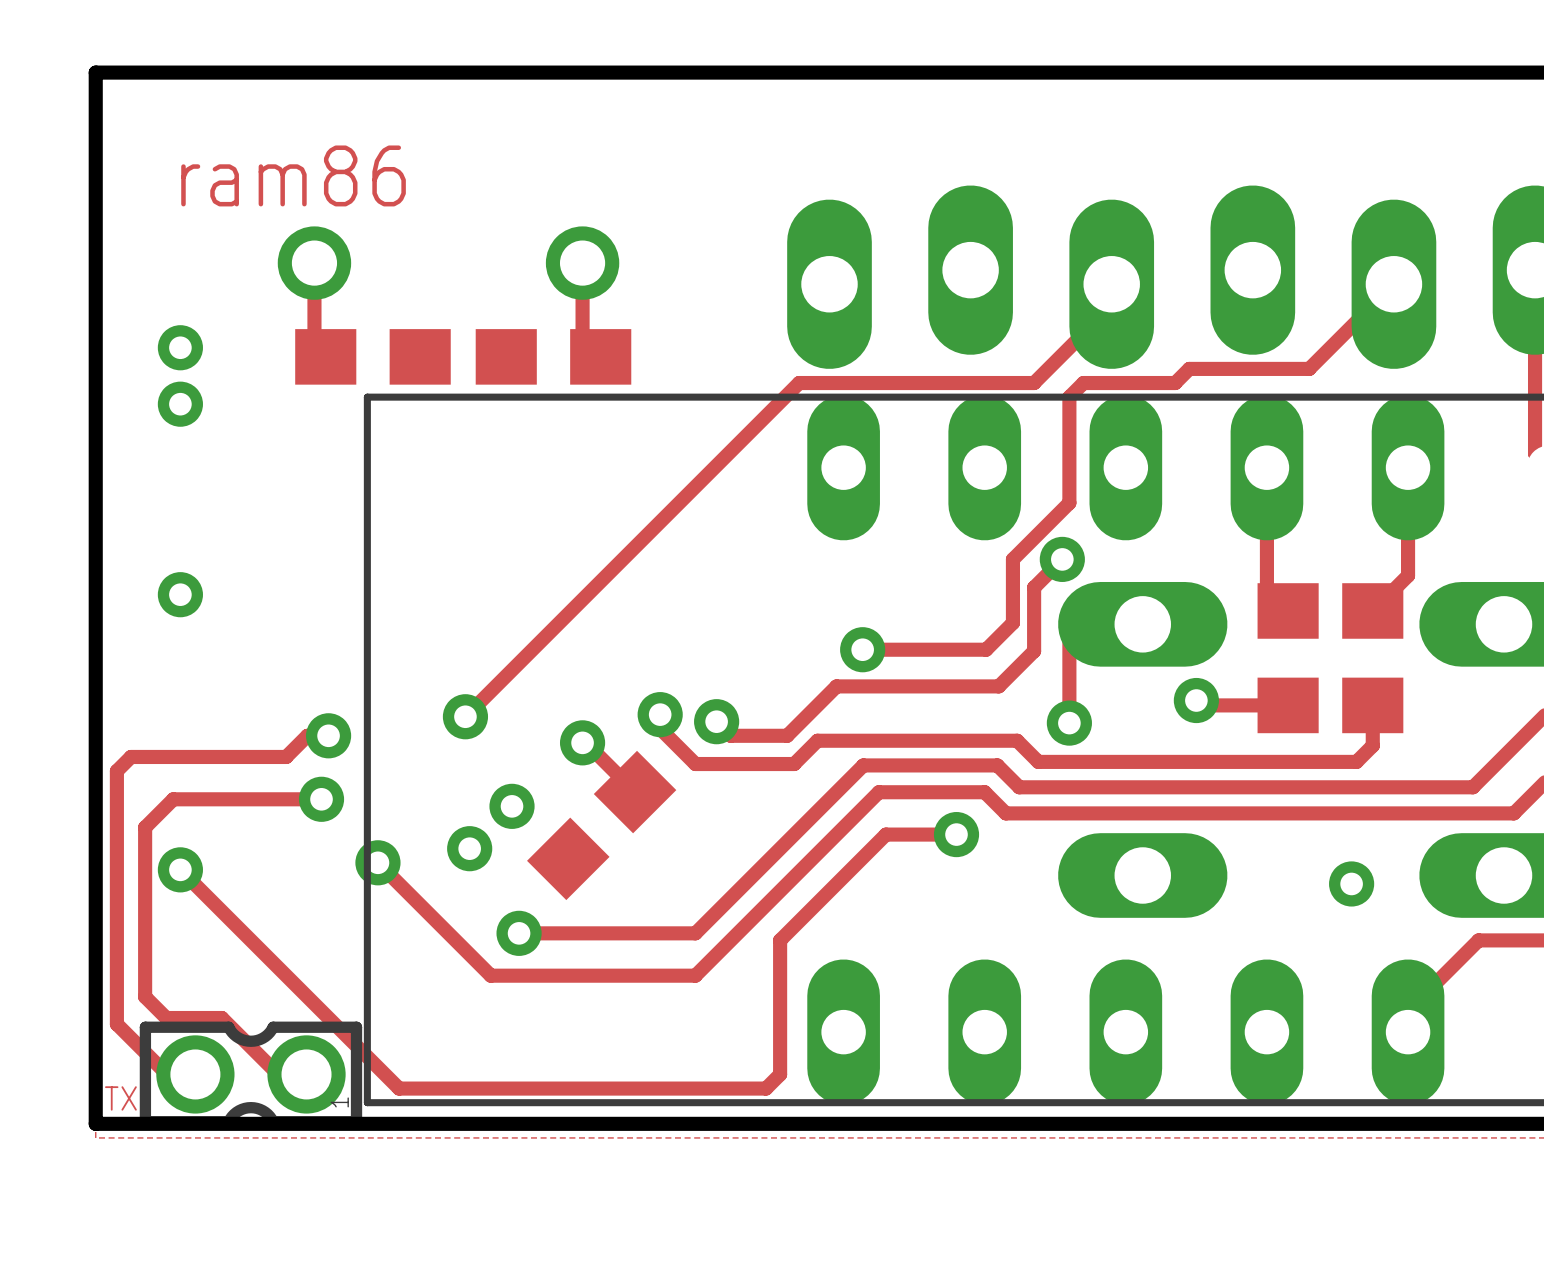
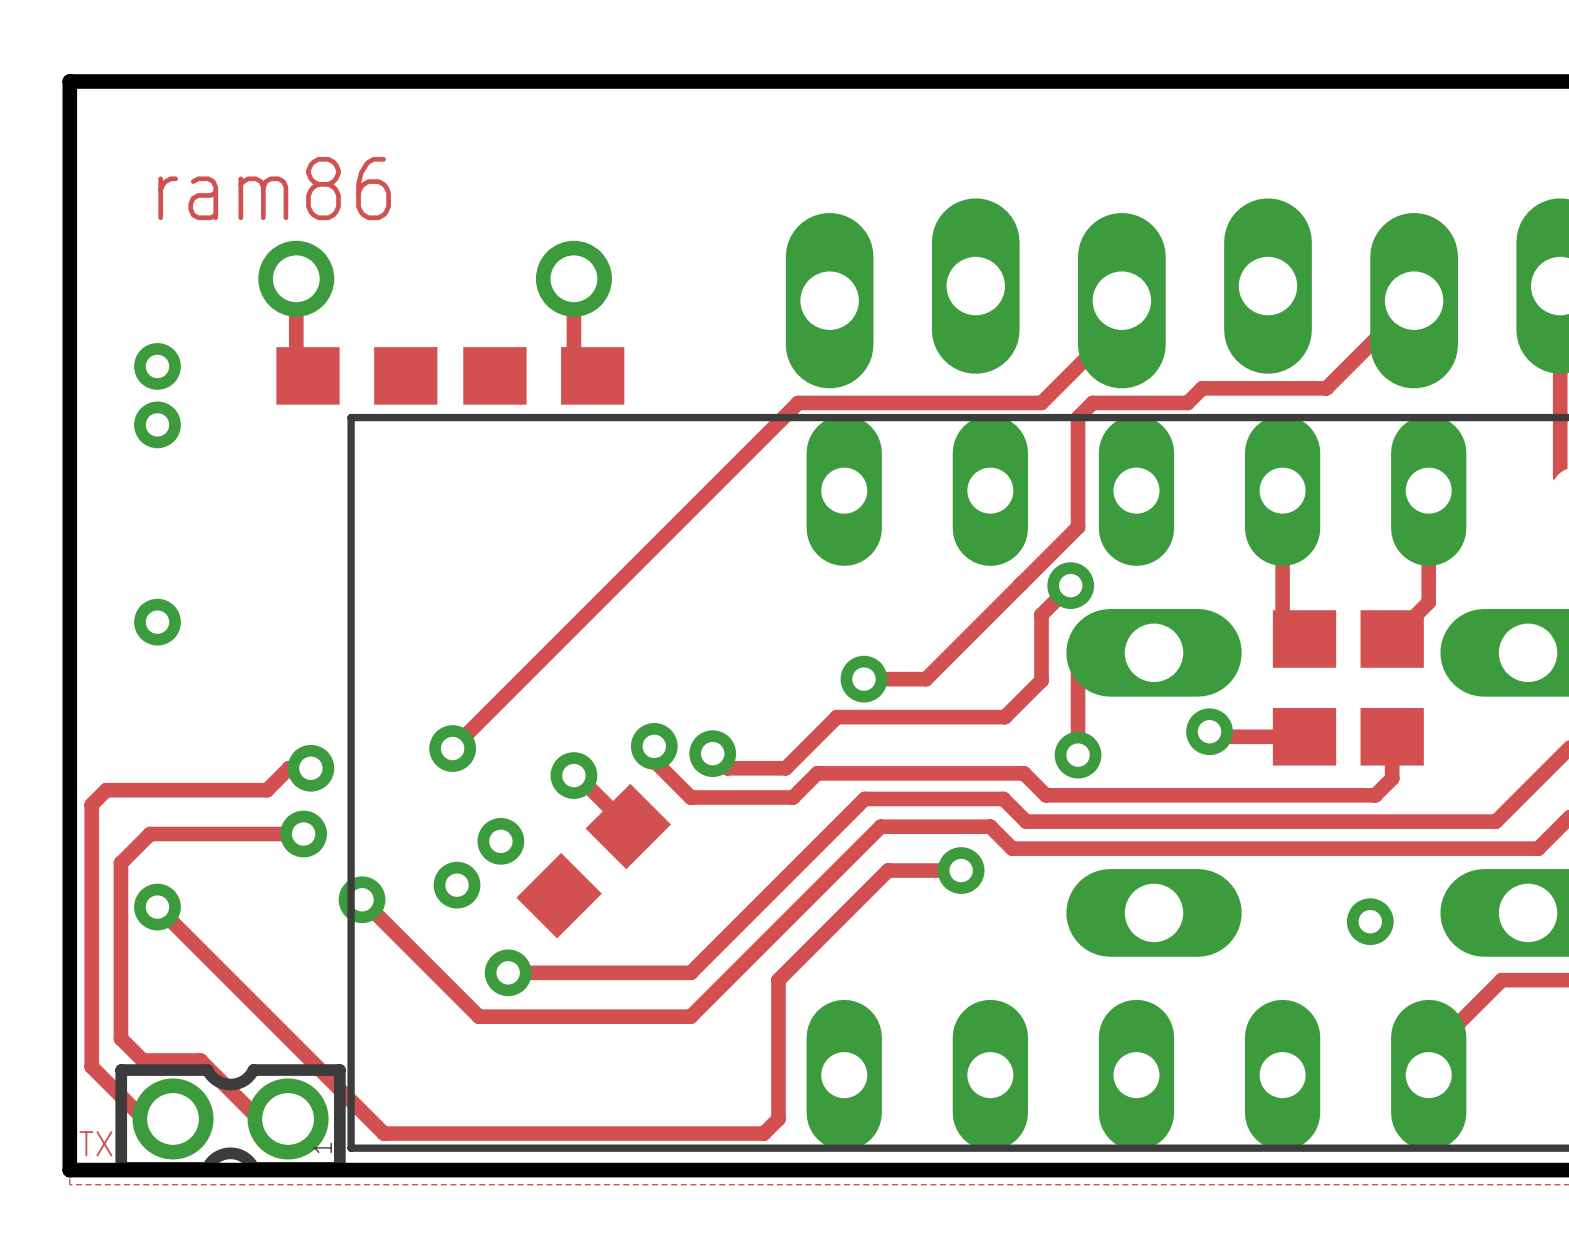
track: (1012, 559) (1012, 622) (986, 649) (922, 649) -> (1019, 585) (926, 679)

